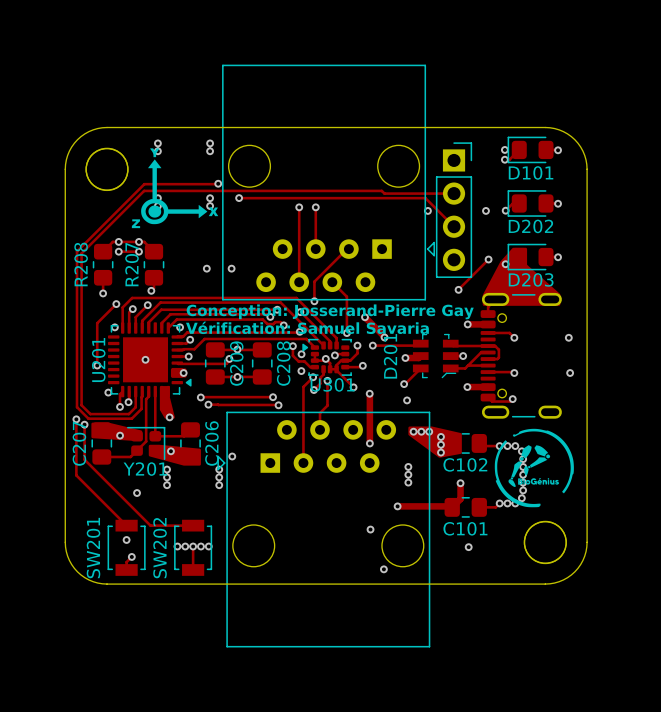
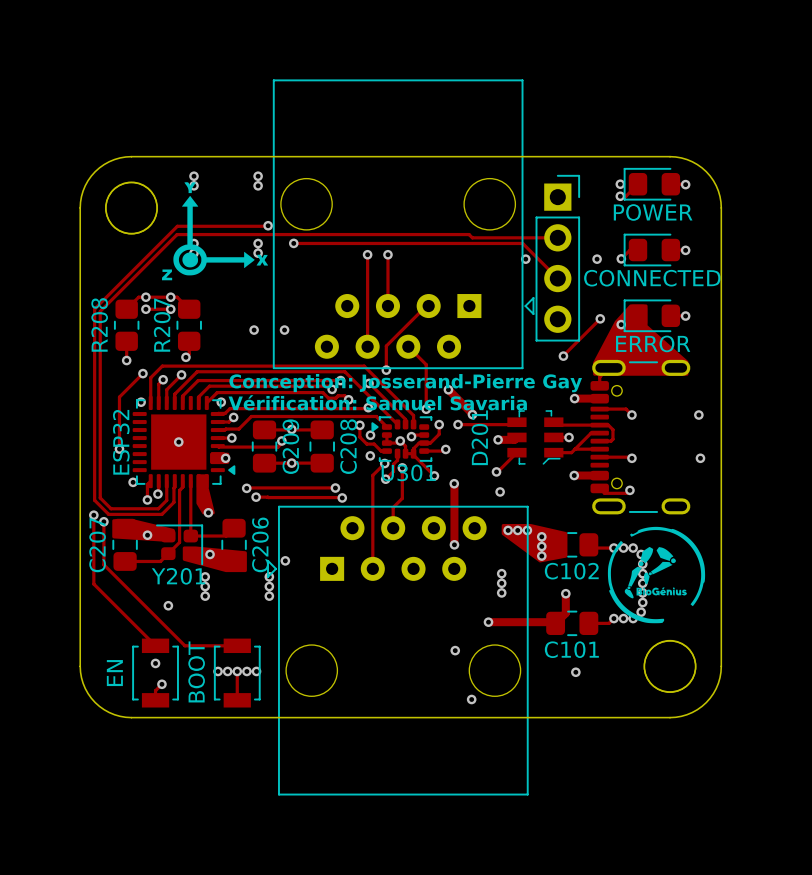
D101 name: D101 (531, 172) -> POWER (653, 212)
D202 name: D202 (530, 226) -> CONNECTED (652, 278)
D203 name: D203 (531, 279) -> ERROR (653, 343)
U201 name: U201 (98, 360) -> ESP32 (121, 442)
SW201 name: SW201 (93, 548) -> EN (114, 673)
SW202 name: SW202 (160, 548) -> BOOT (196, 671)

